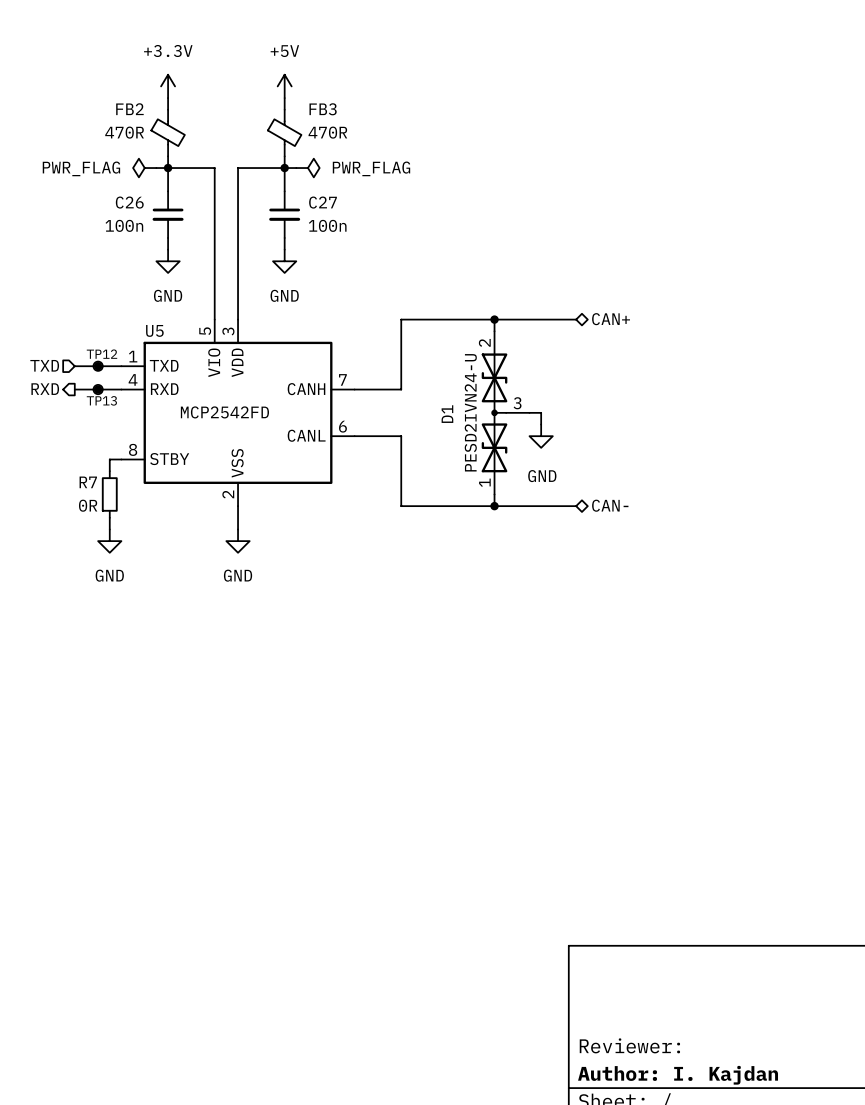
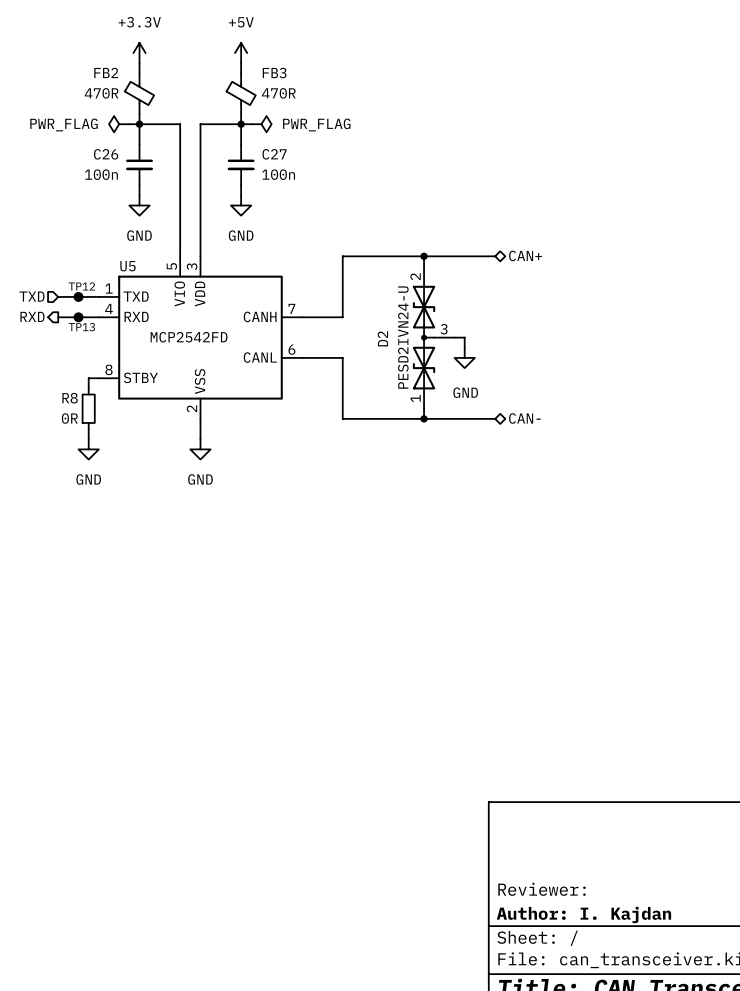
D1 name: D1 (447, 414) -> D2 (382, 338)
R7 name: R7 (88, 482) -> R8 (70, 398)

